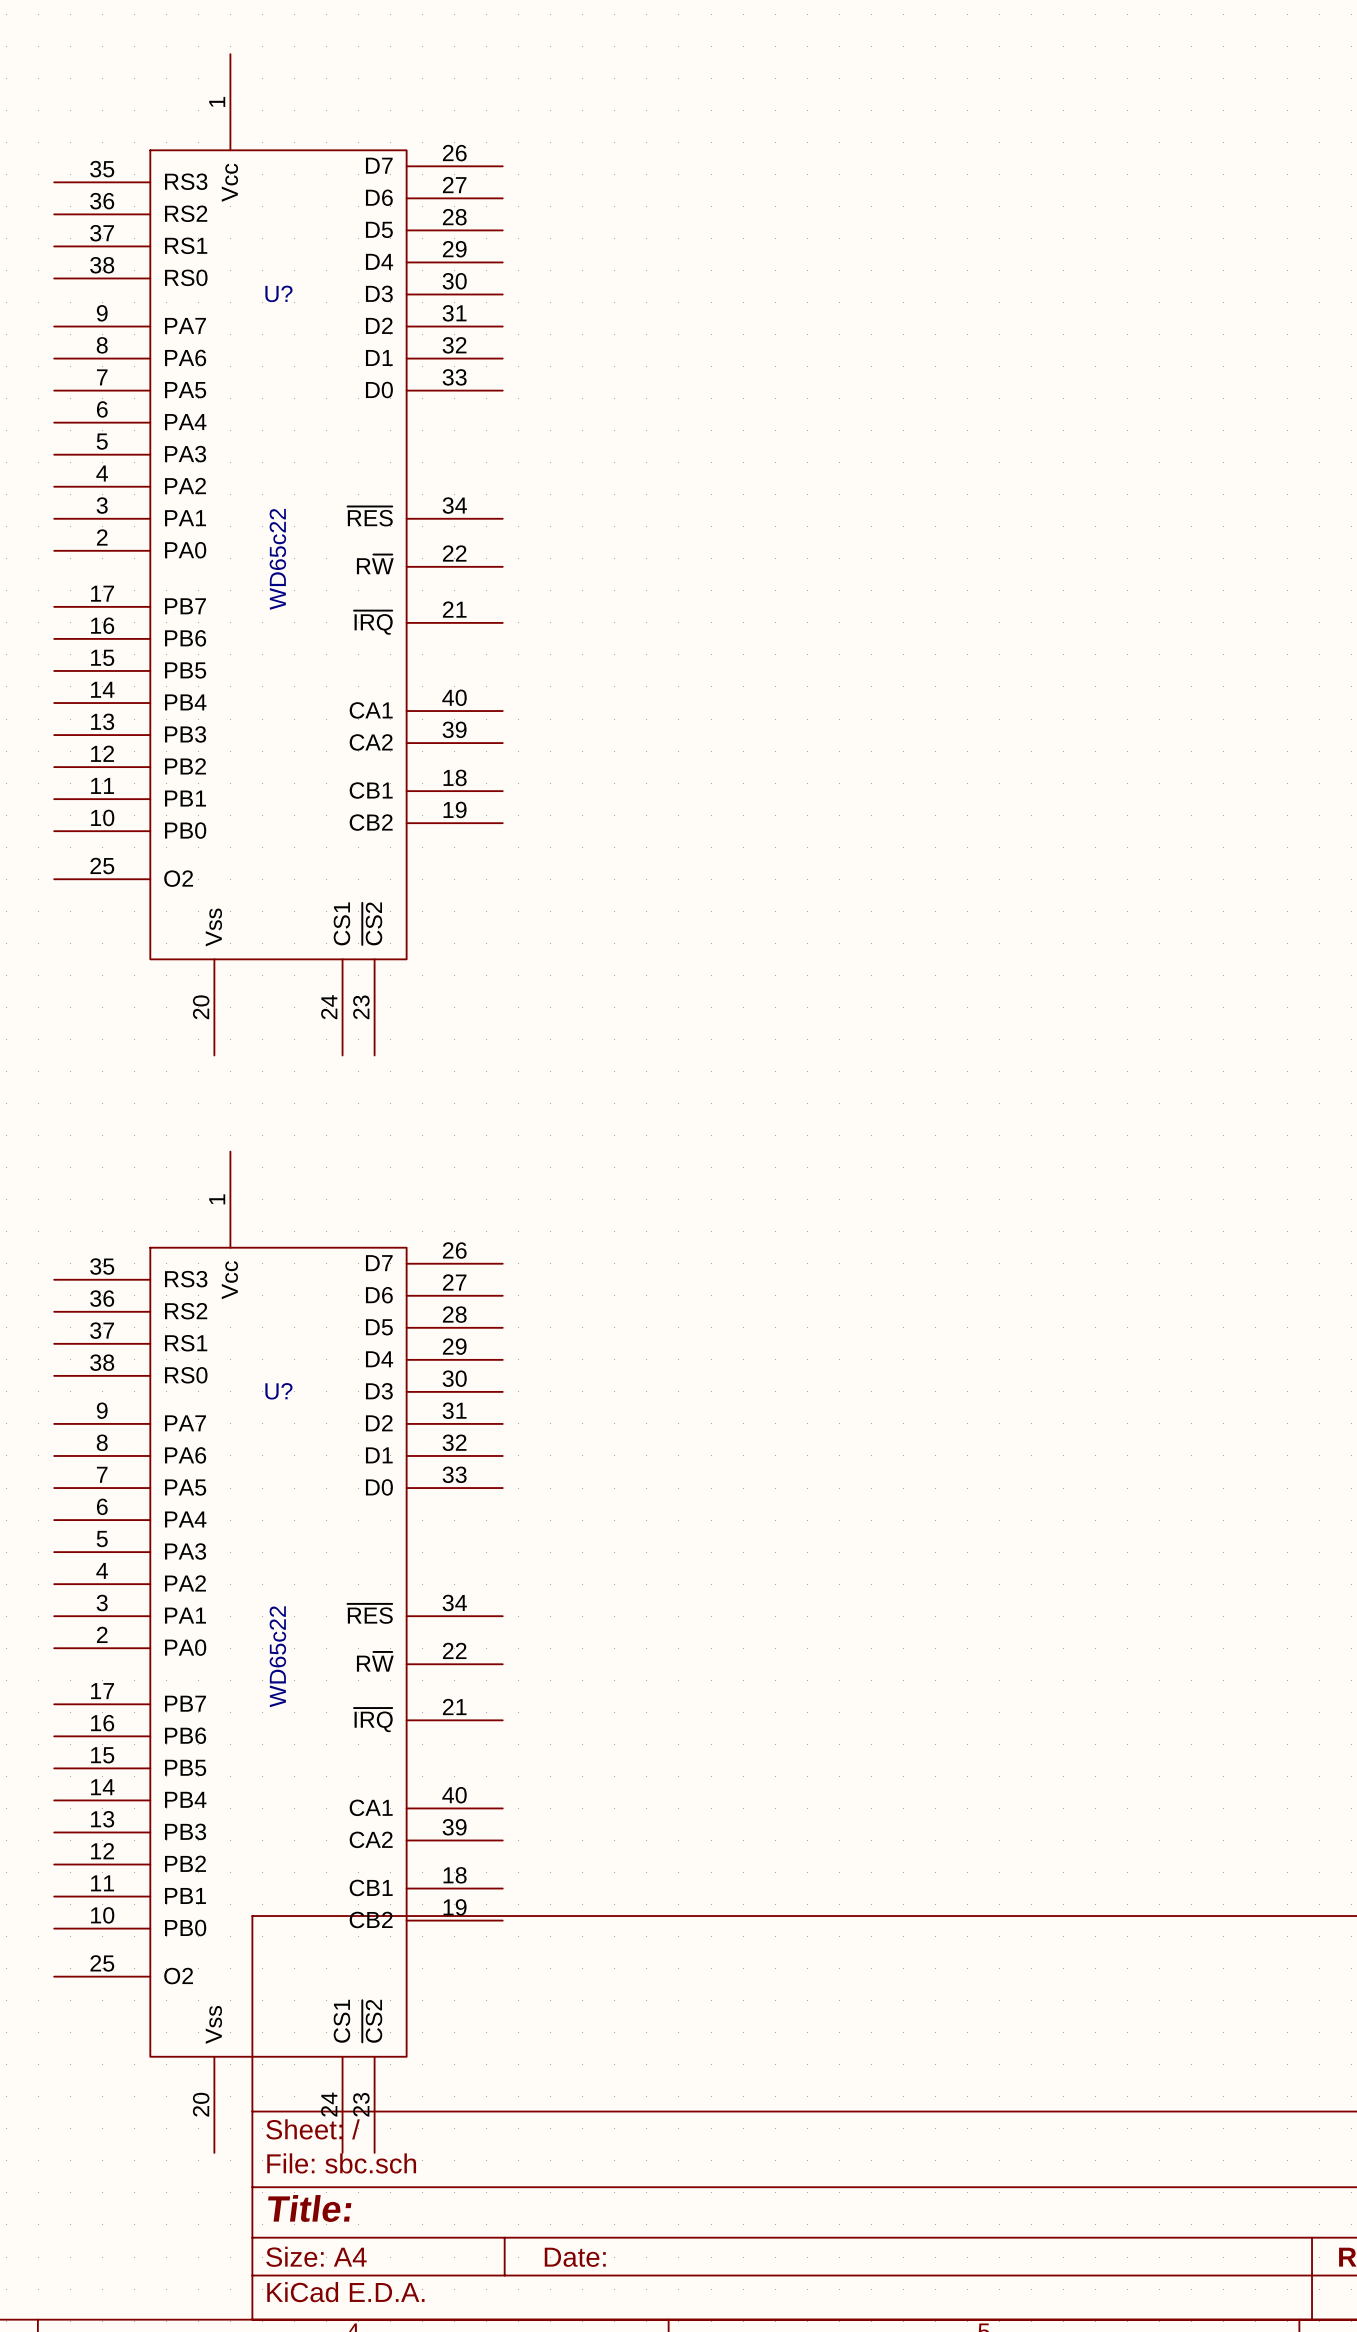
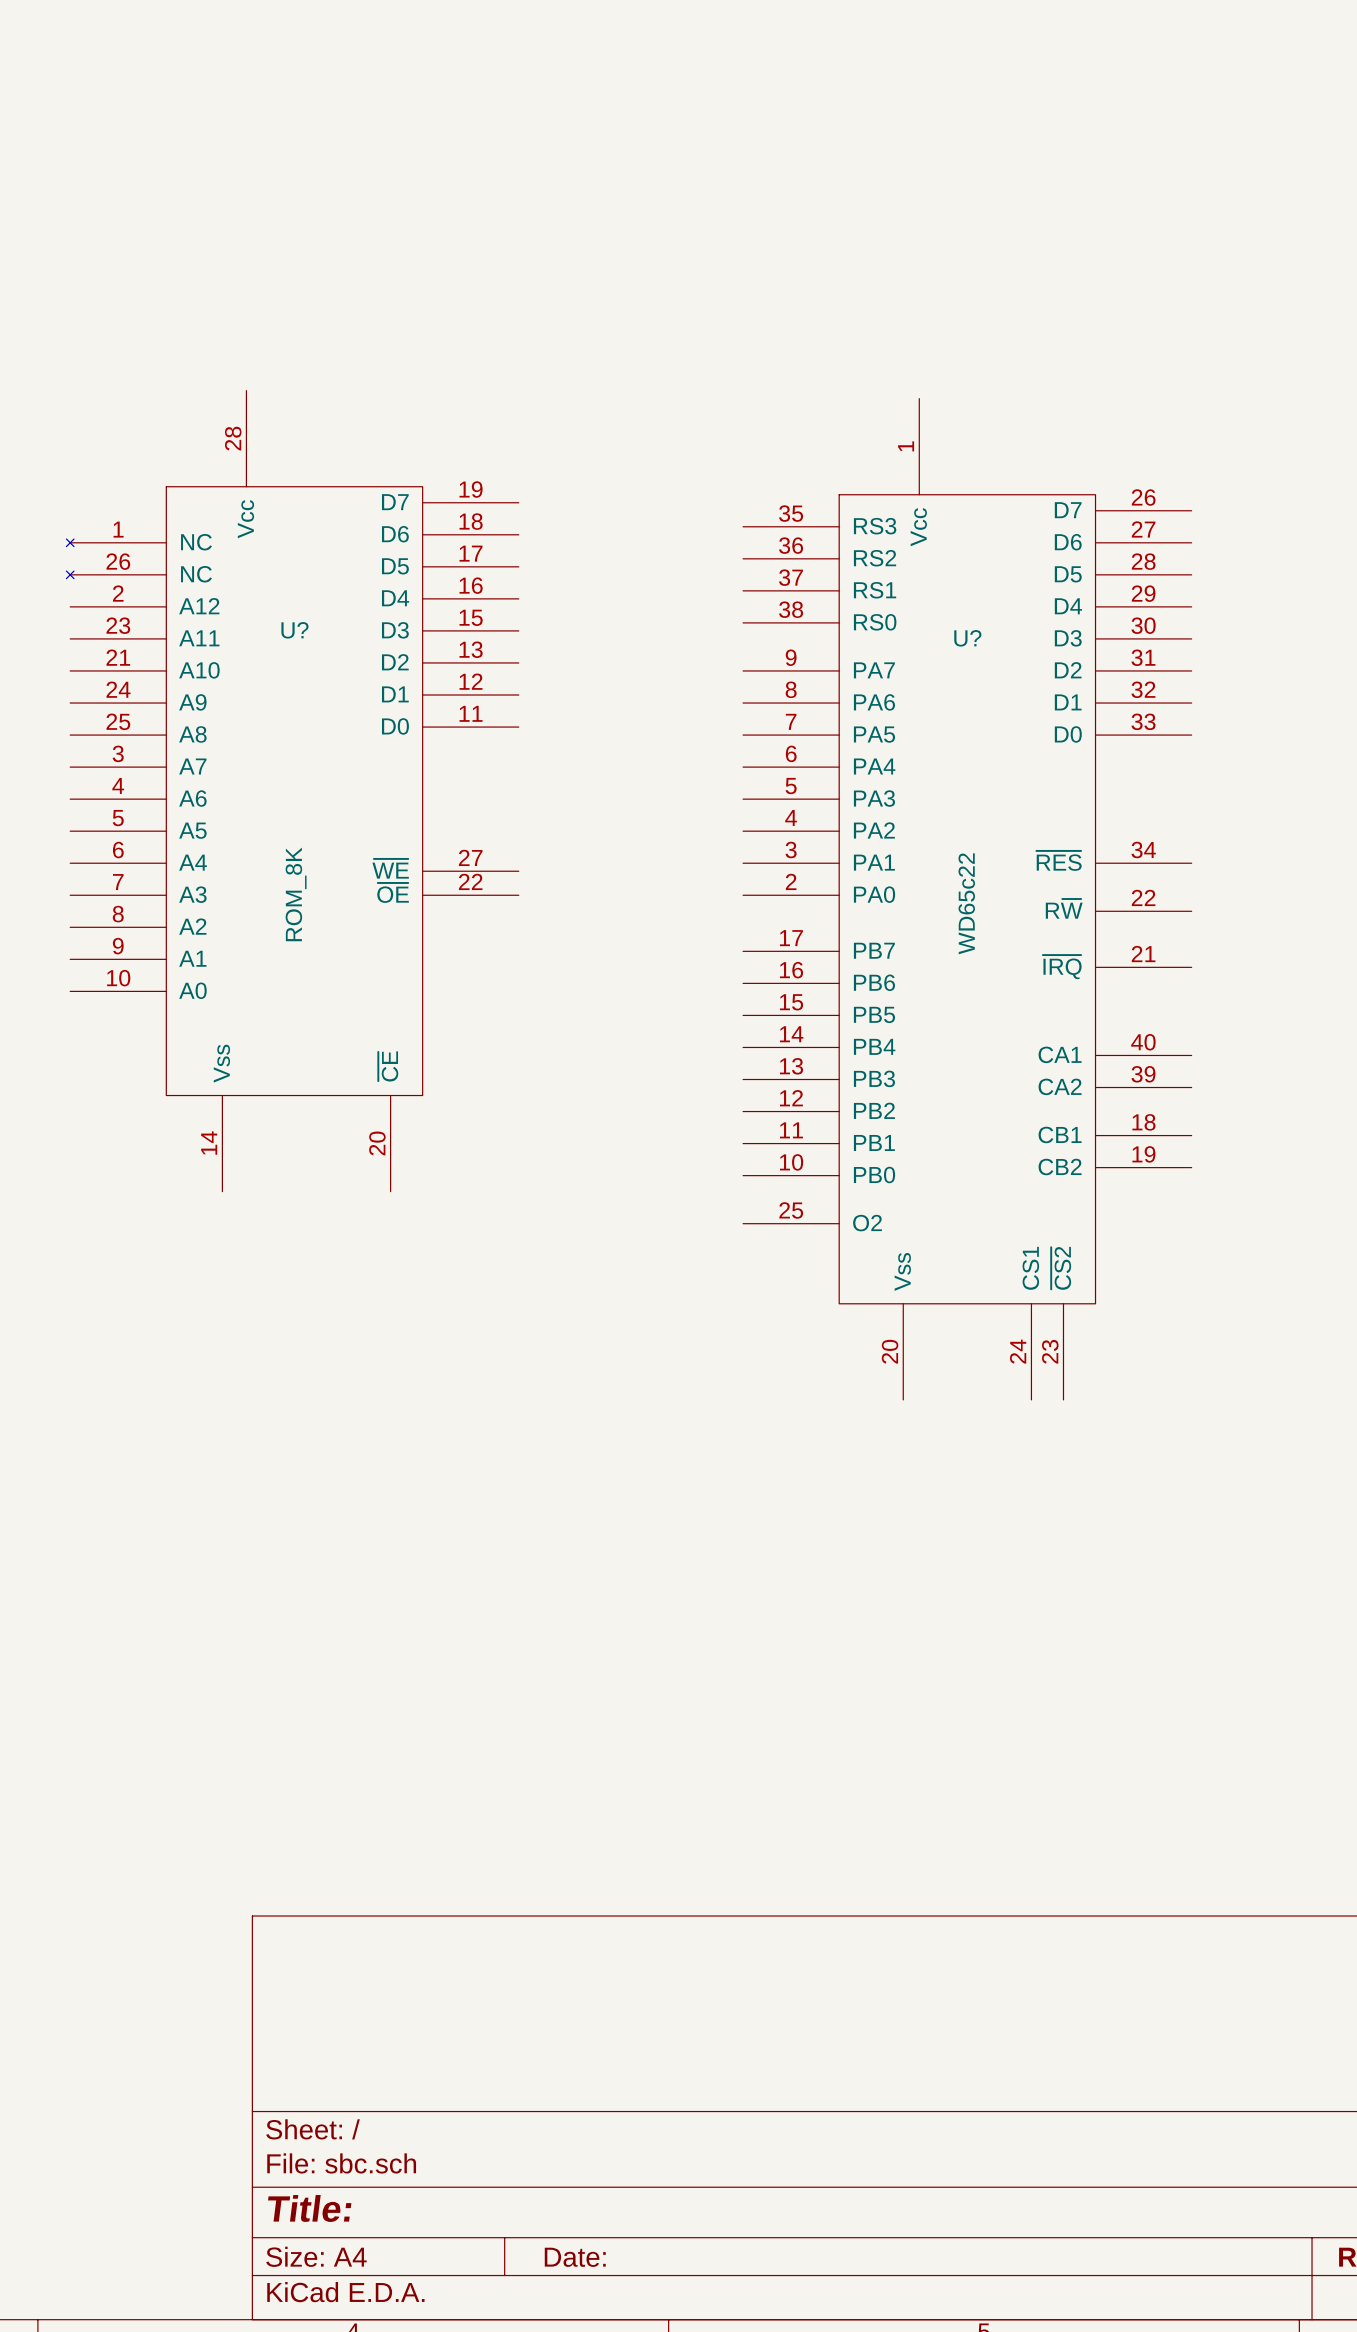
U?: WD65c22 (278, 554) -> none
U?: none -> ROM_8K (292, 791)
U?: none -> WD65c22 (967, 899)
U?: WD65c22 (278, 1652) -> none

